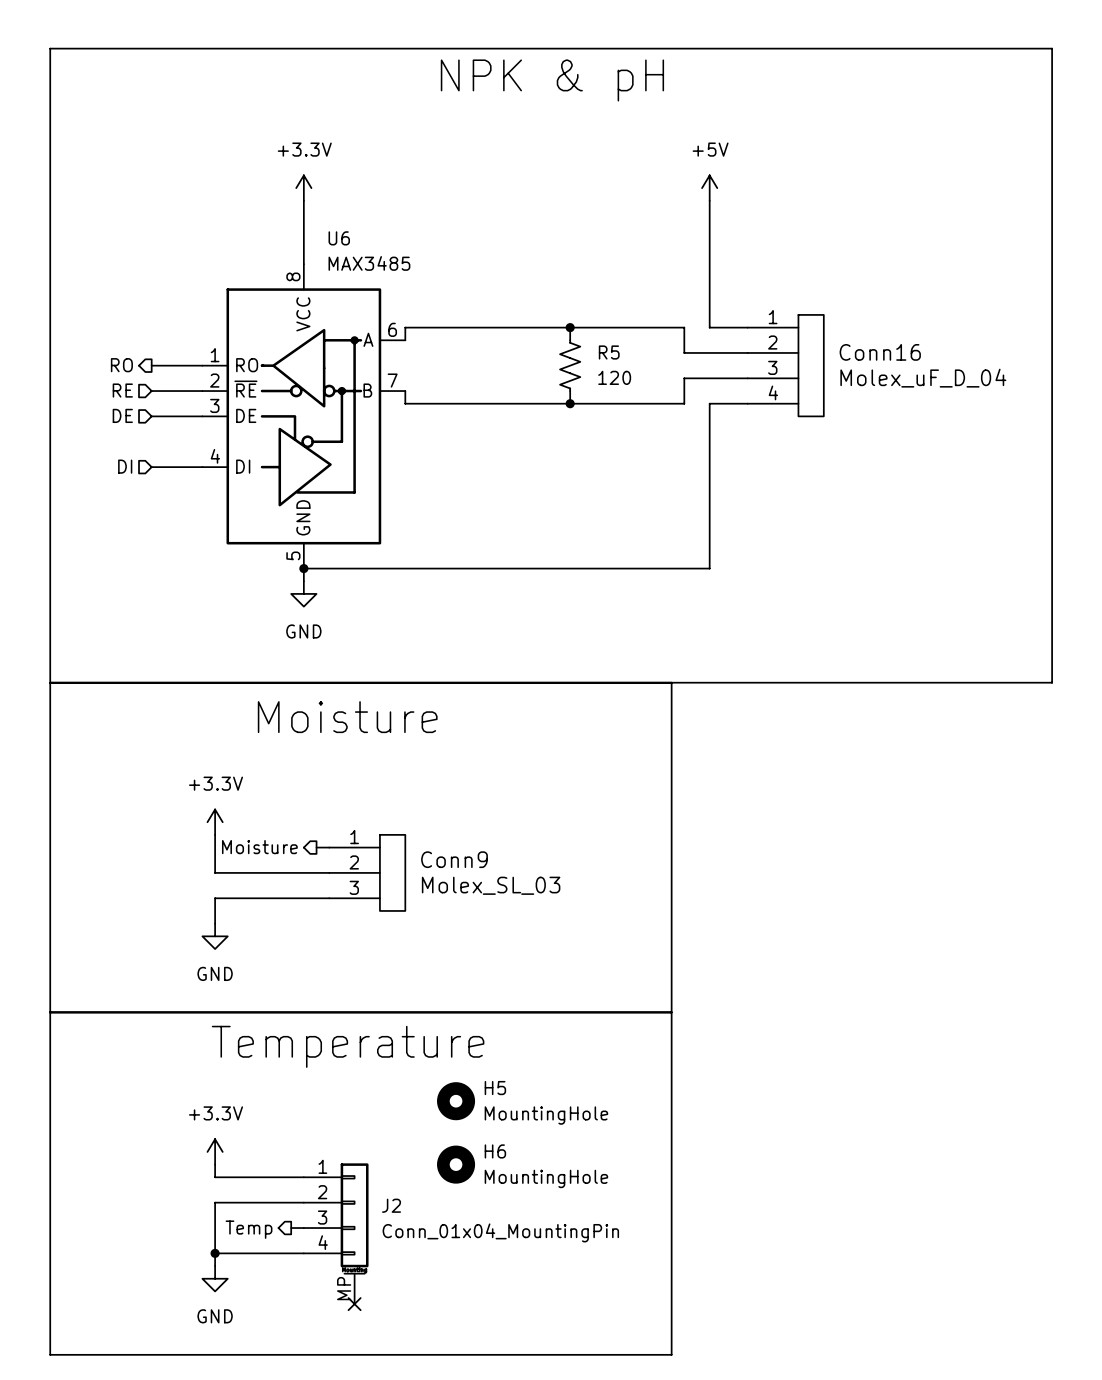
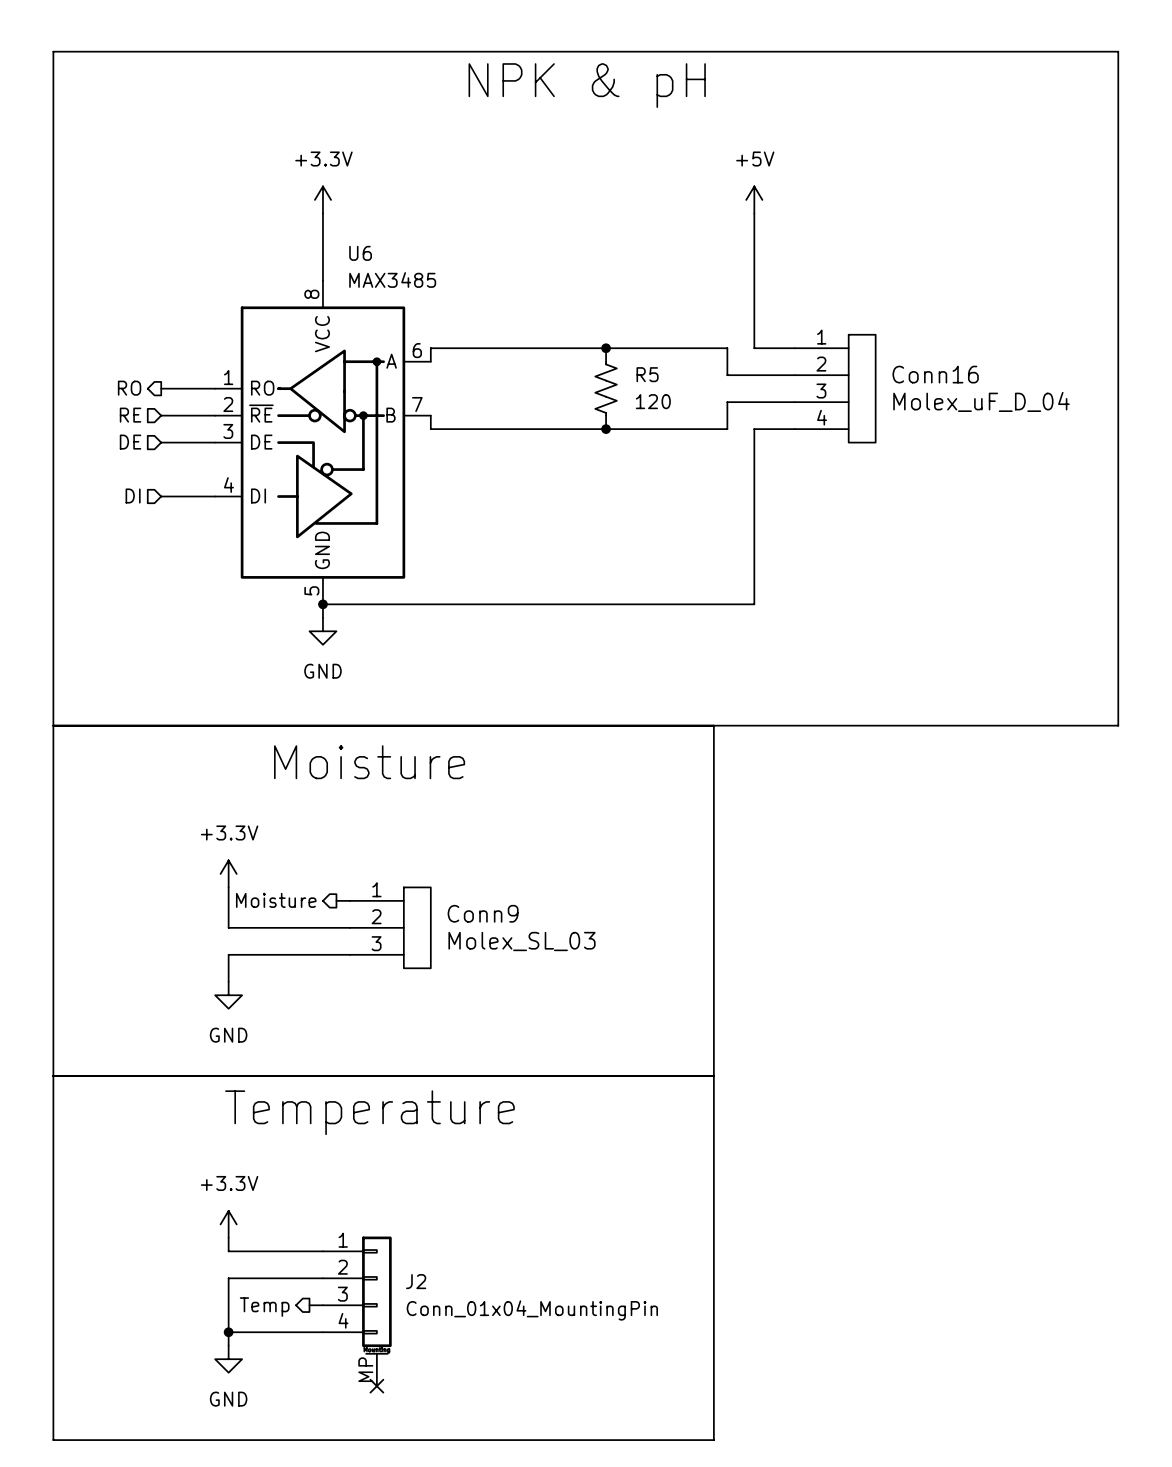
H5: MountingHole (456, 1101) -> none
H6: MountingHole (456, 1164) -> none

